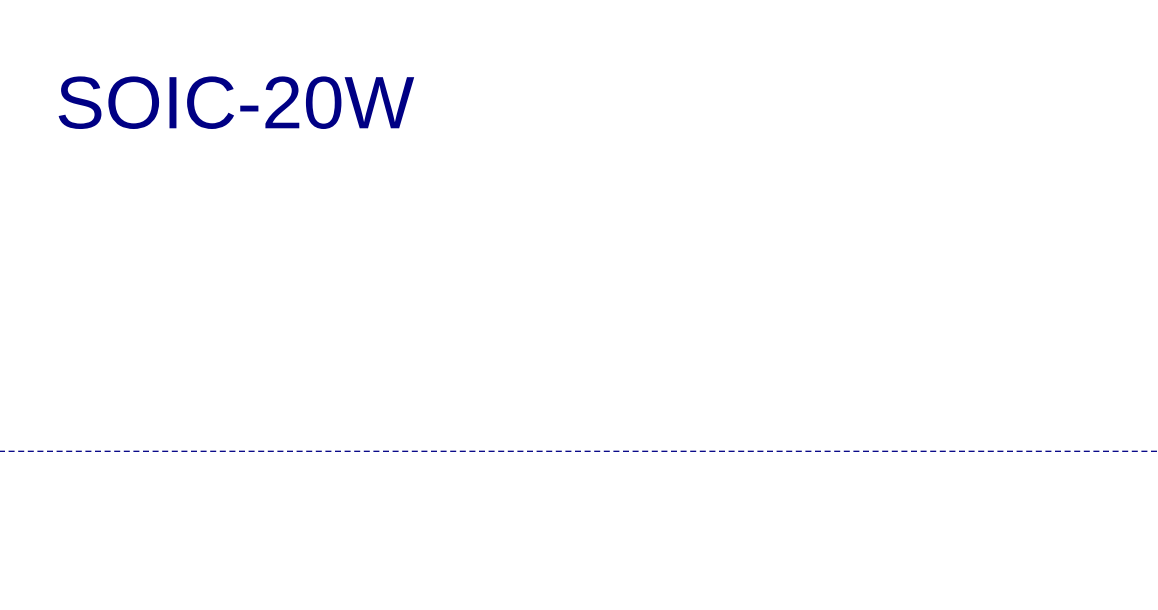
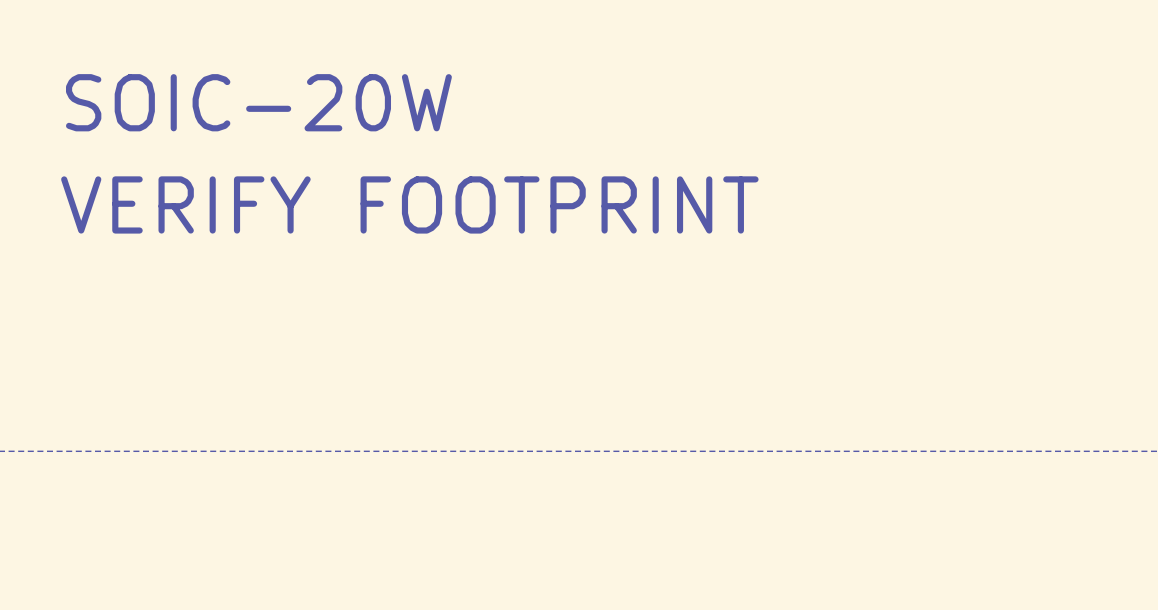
text: none -> VERIFY FOOTPRINT (409, 204)

